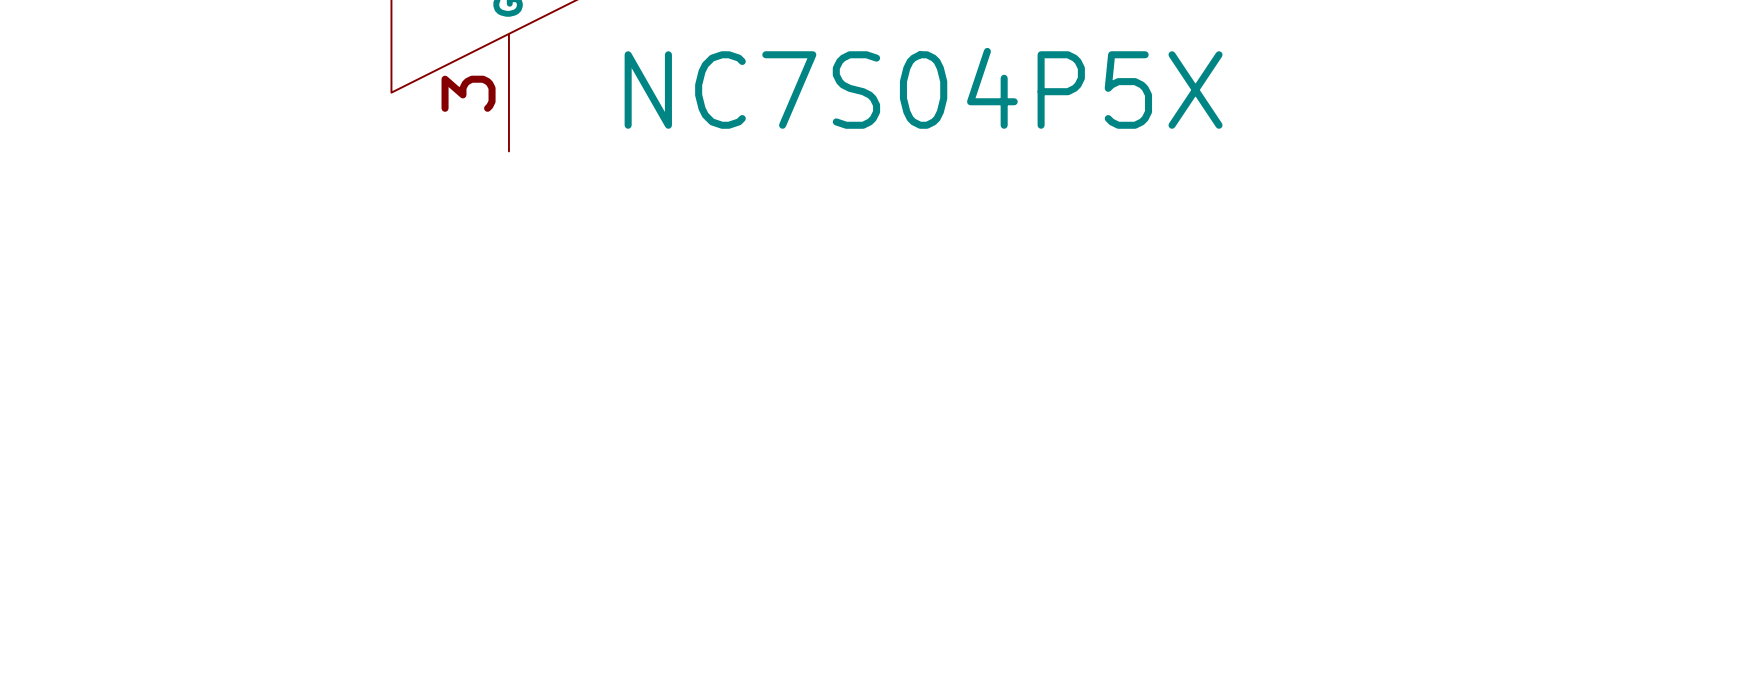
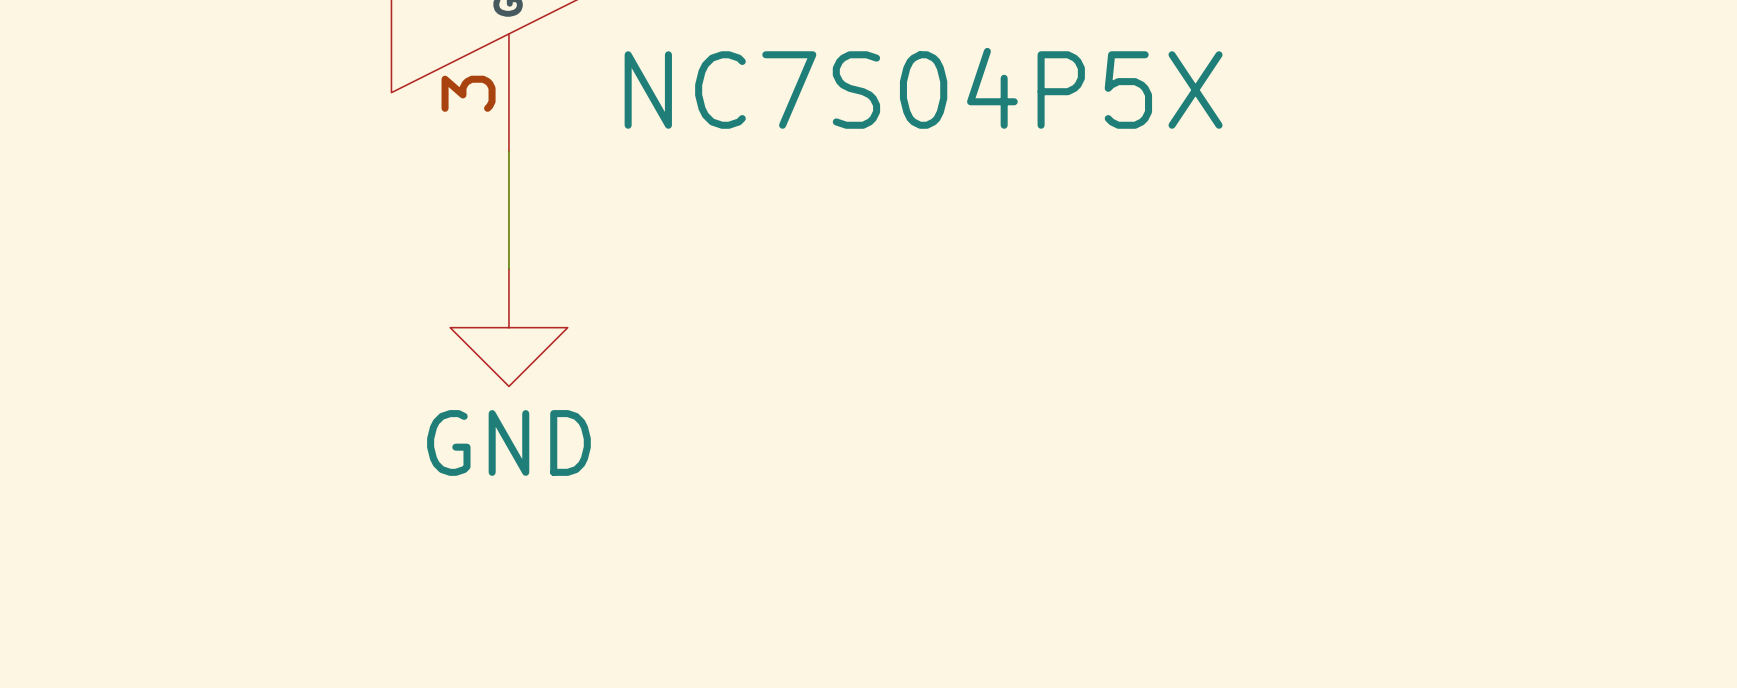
wire: none -> (508, 151) (508, 268)
power symbol: none -> GND (508, 327)

